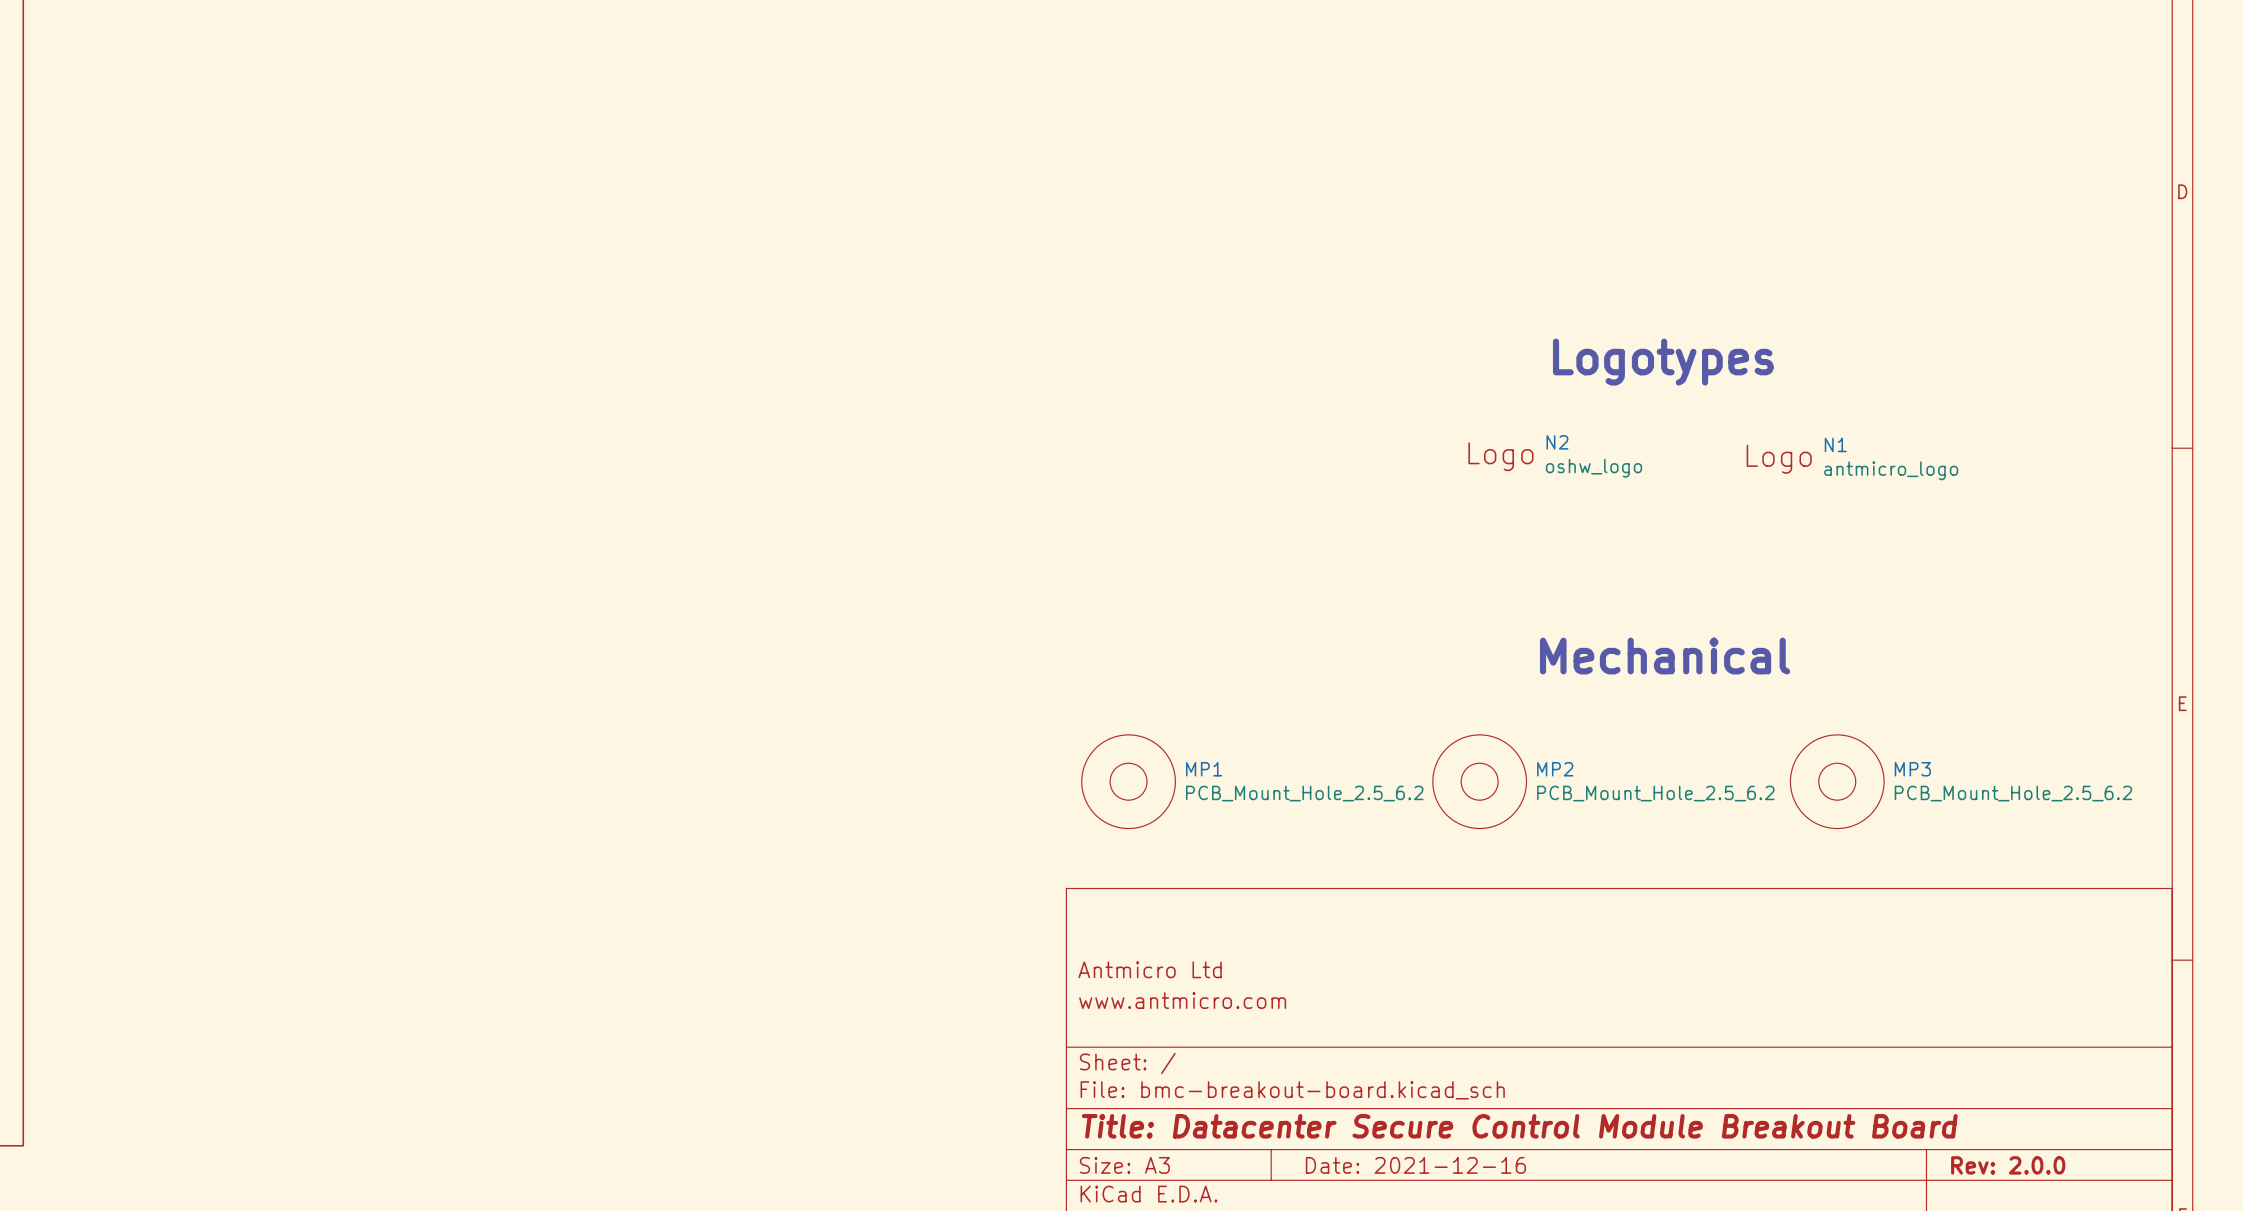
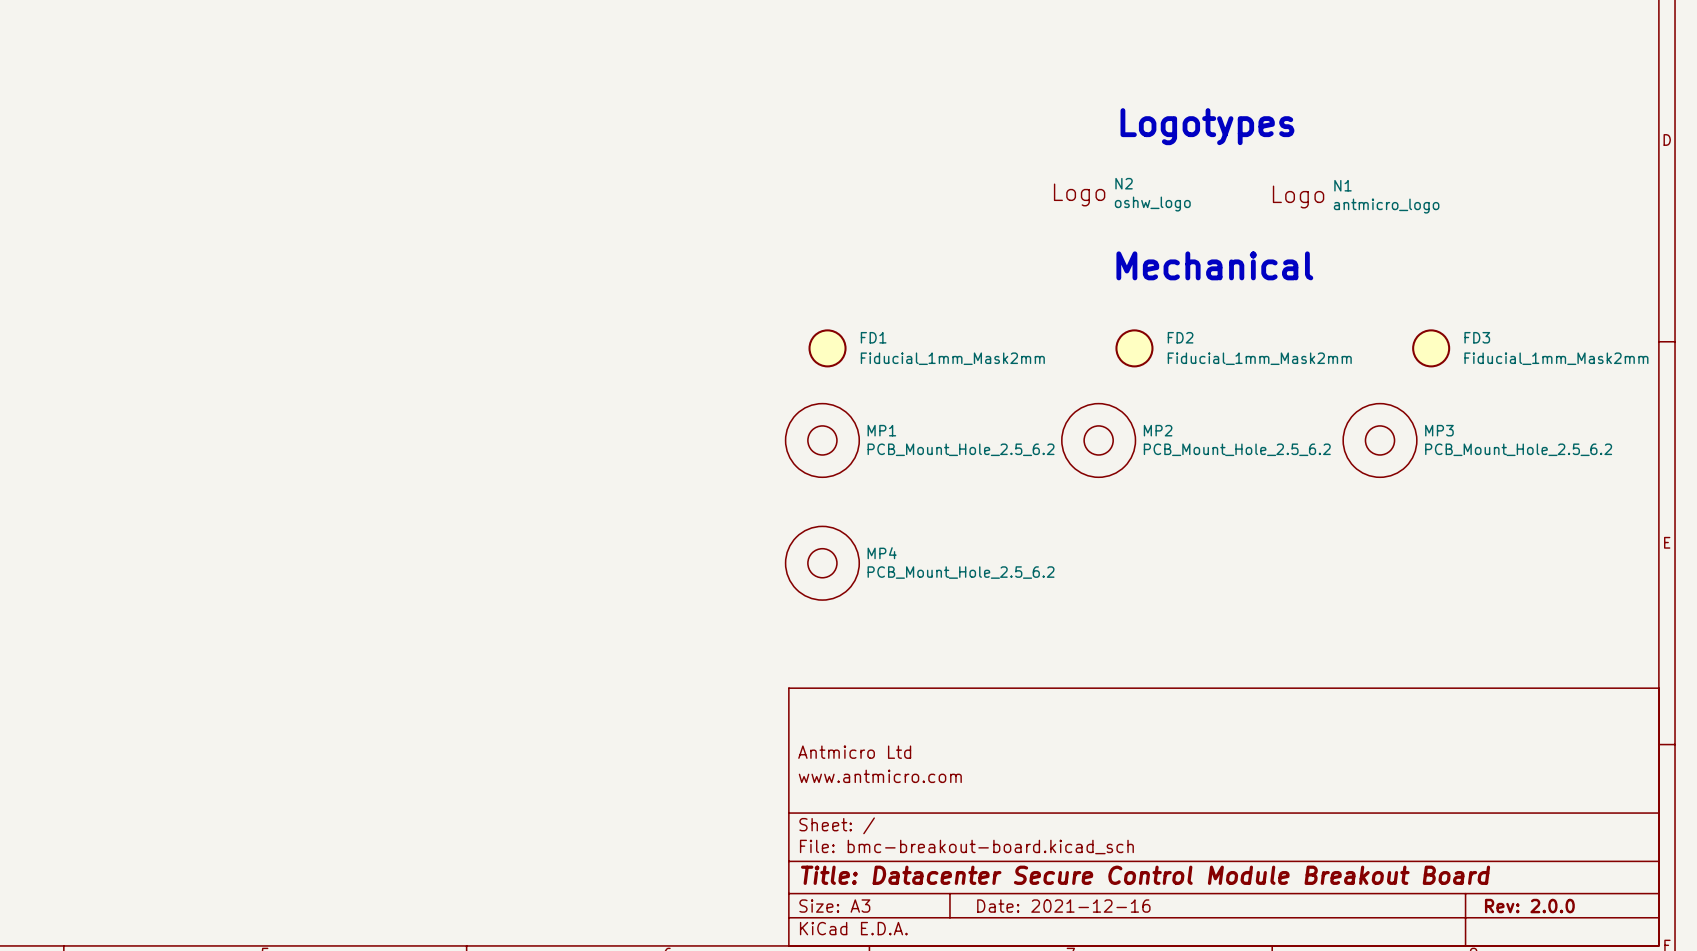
text: none -> Mechanical (1214, 265)
text position: Logotypes (1663, 362) -> Logotypes (1207, 126)
FD1: none -> Fiducial_1mm_Mask2mm (827, 348)
FD2: none -> Fiducial_1mm_Mask2mm (1134, 348)
N2 position: (1555, 456) -> (1122, 194)
FD3: none -> Fiducial_1mm_Mask2mm (1431, 348)
N1 position: (1852, 458) -> (1356, 196)
text: Mechanical (1665, 656) -> none
MP4: none -> PCB_Mount_Hole_2.5_6.2 (822, 563)
MP1 position: (1128, 781) -> (822, 440)
MP2 position: (1479, 781) -> (1098, 440)
MP3 position: (1837, 781) -> (1380, 440)

